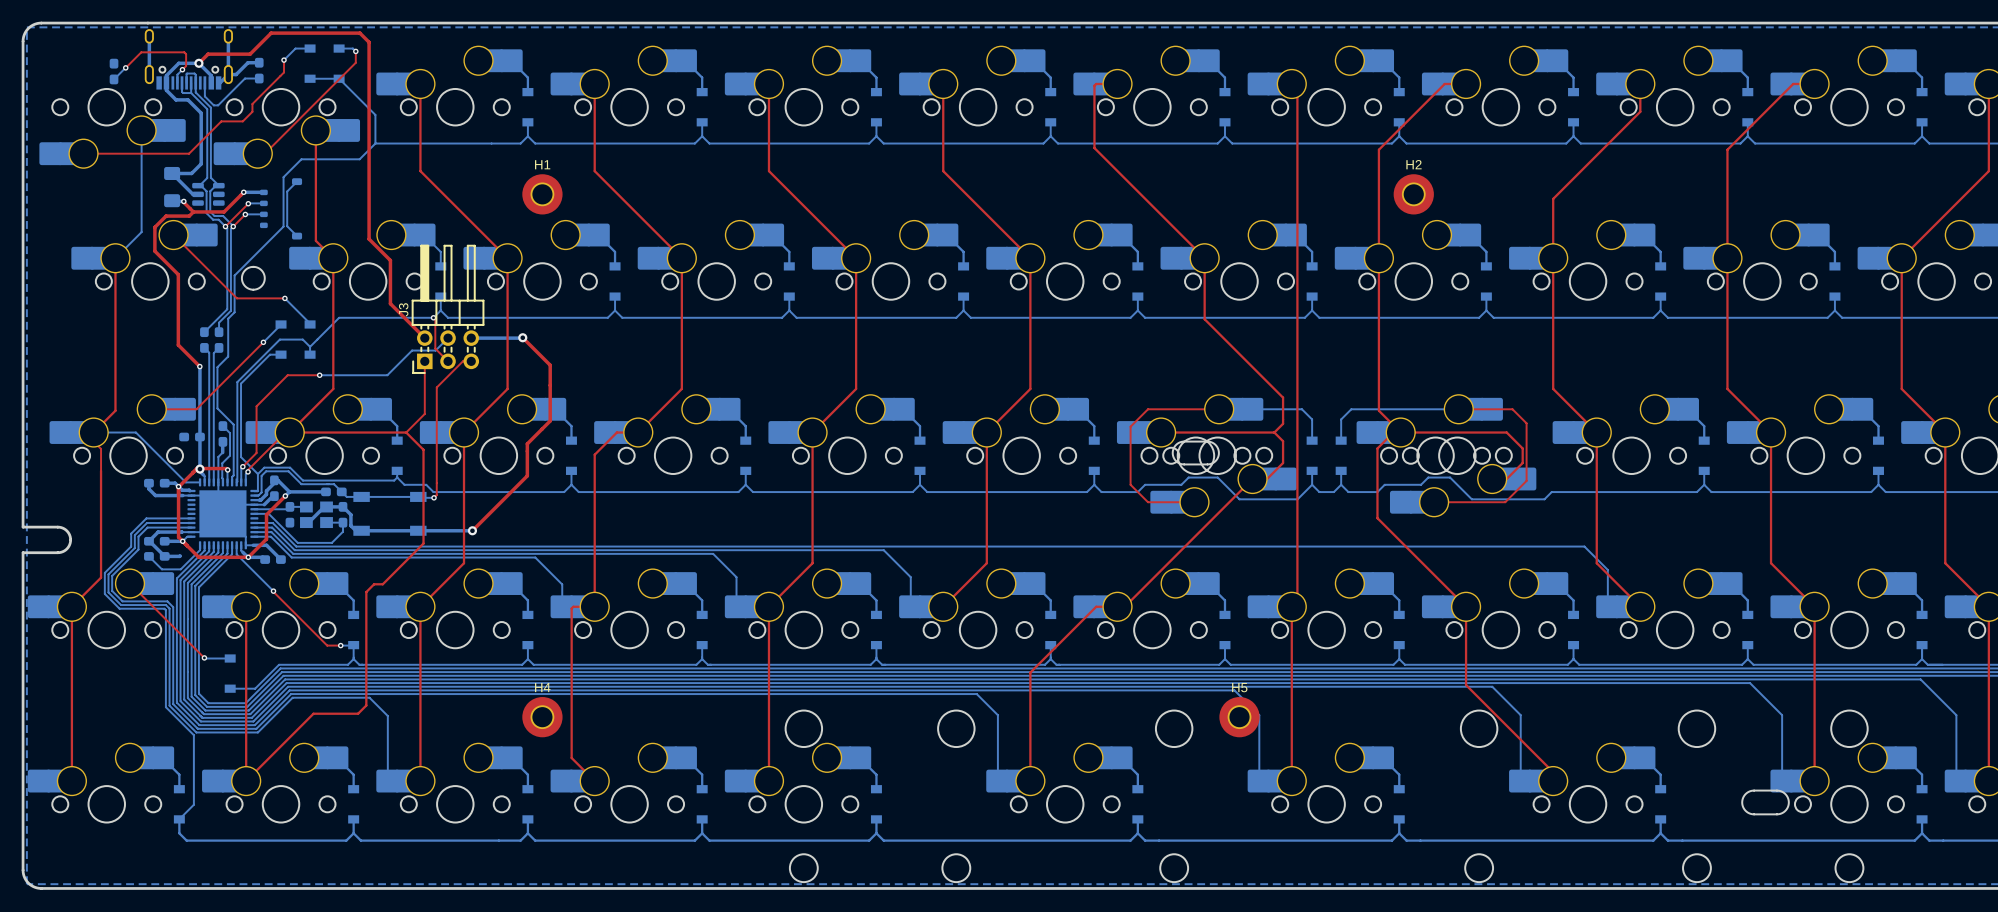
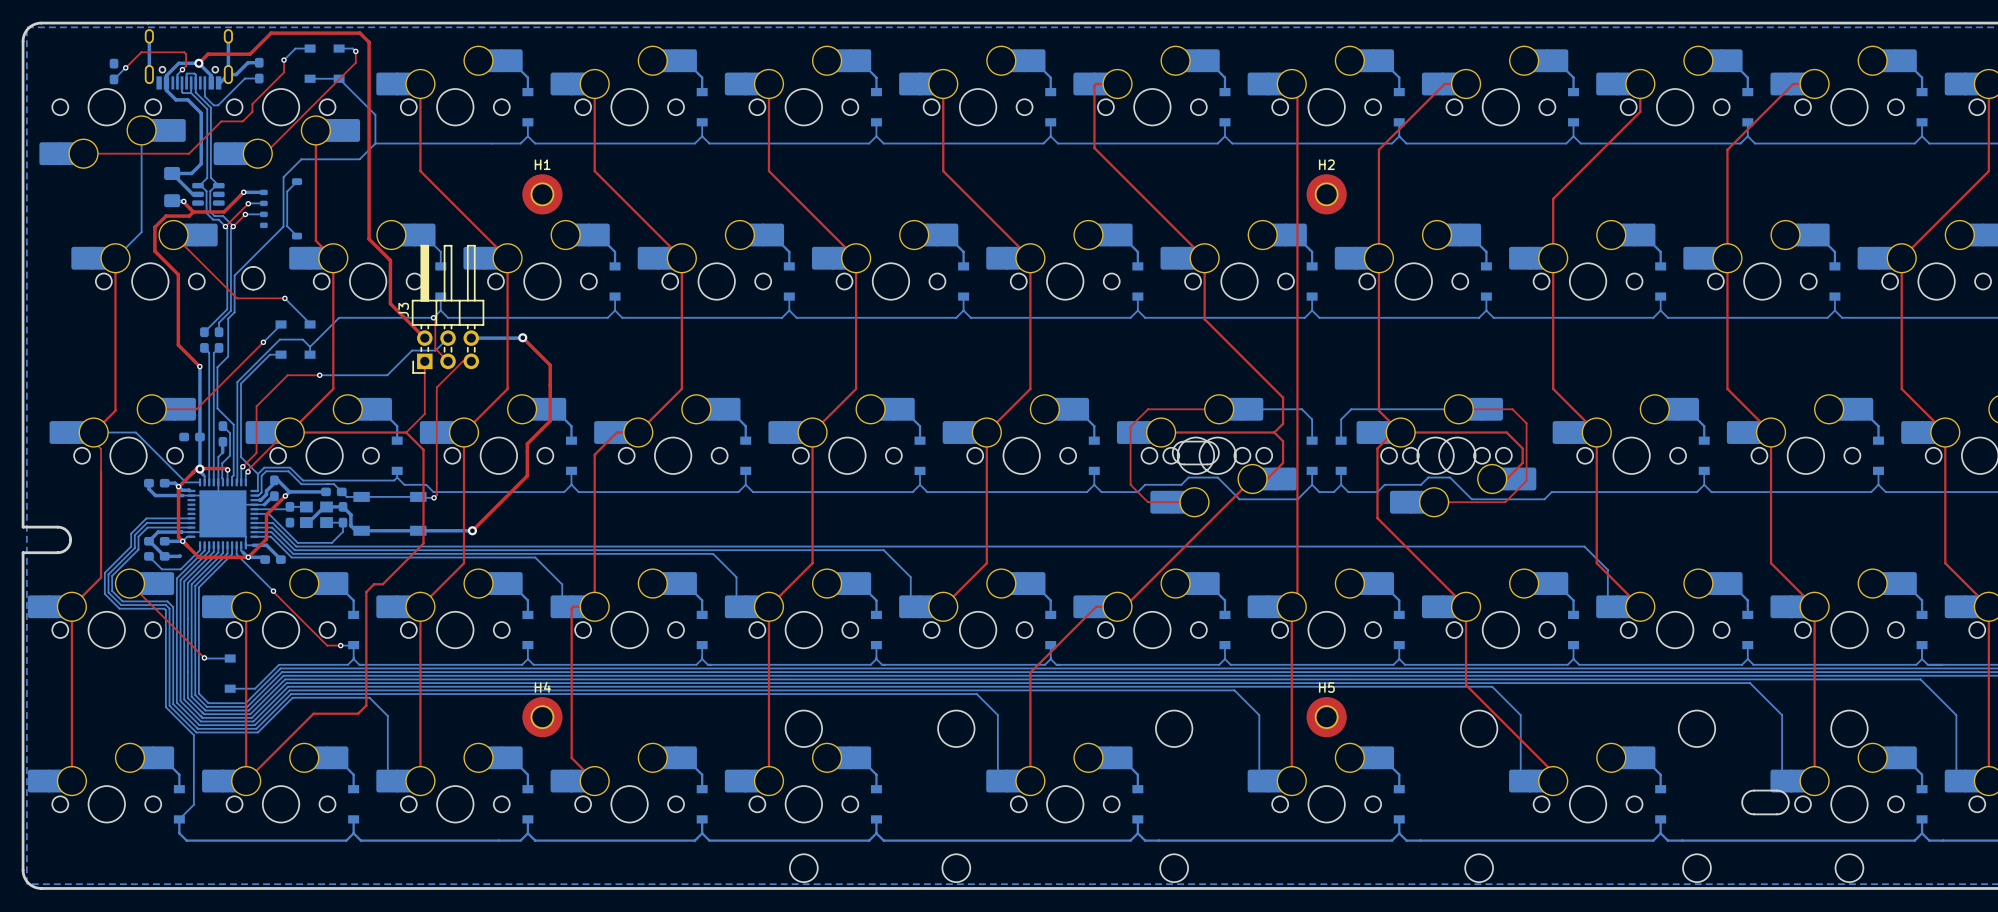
H2 position: (1413, 194) -> (1326, 194)
H5 position: (1239, 717) -> (1326, 717)

